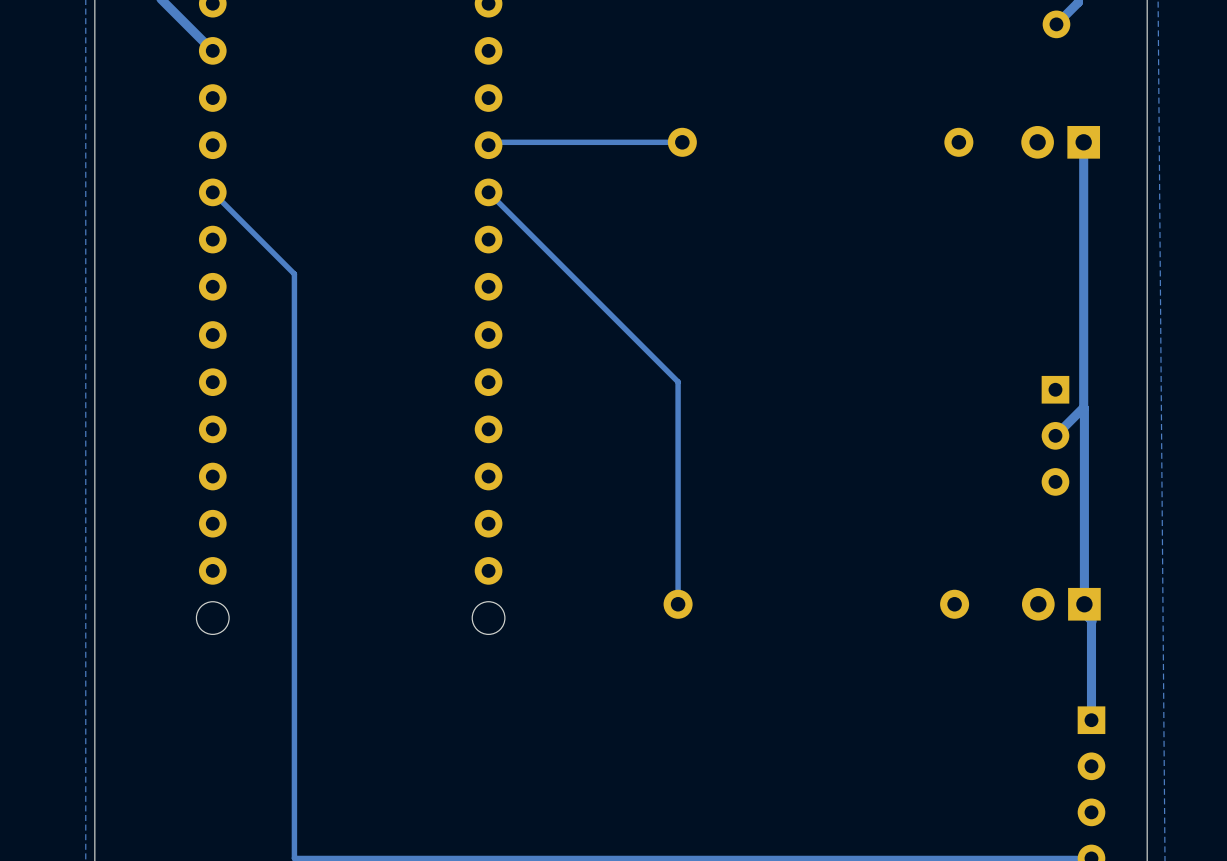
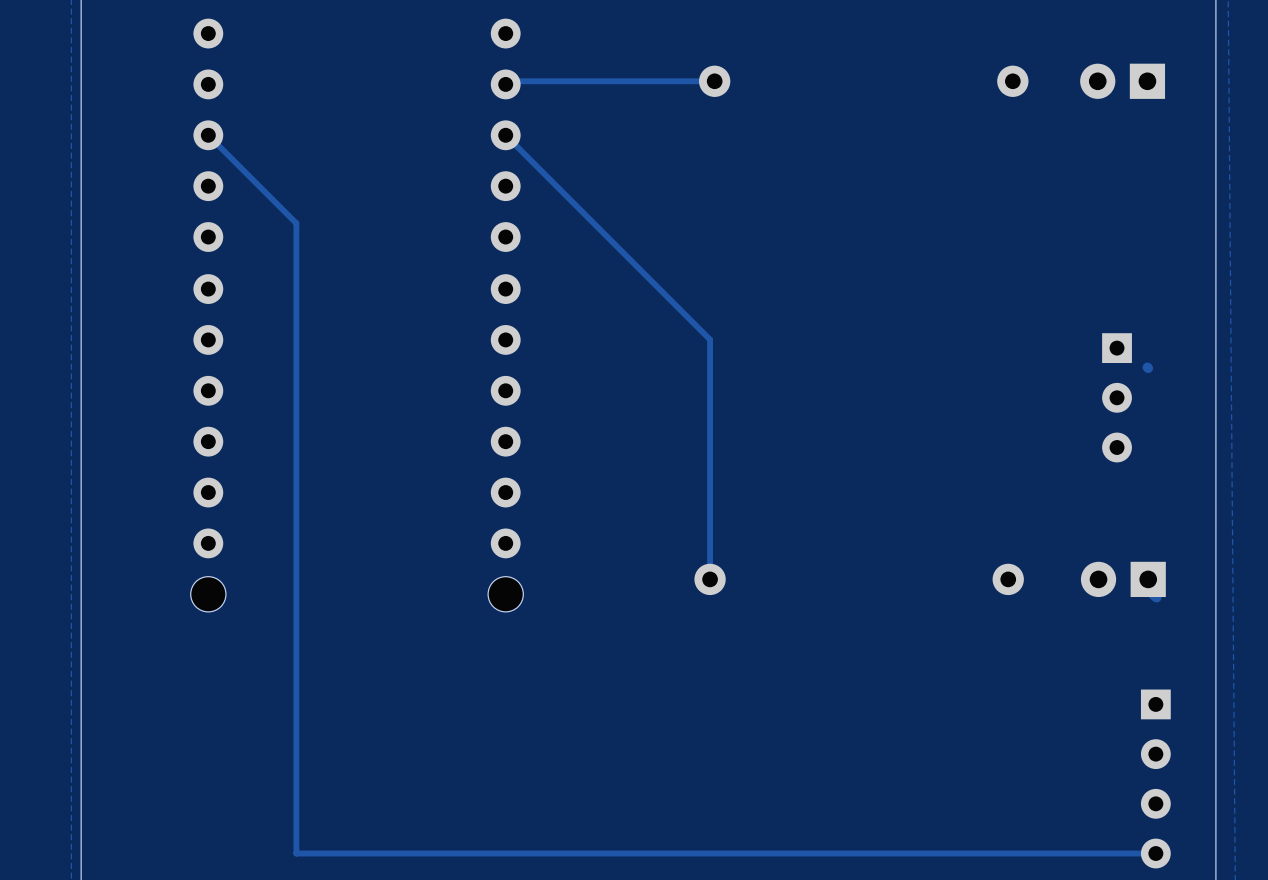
track: (1083, 142) (1083, 407) (1055, 435) -> none
track: (1084, 408) (1084, 604) -> none
track: (1091, 620) (1091, 720) -> none

